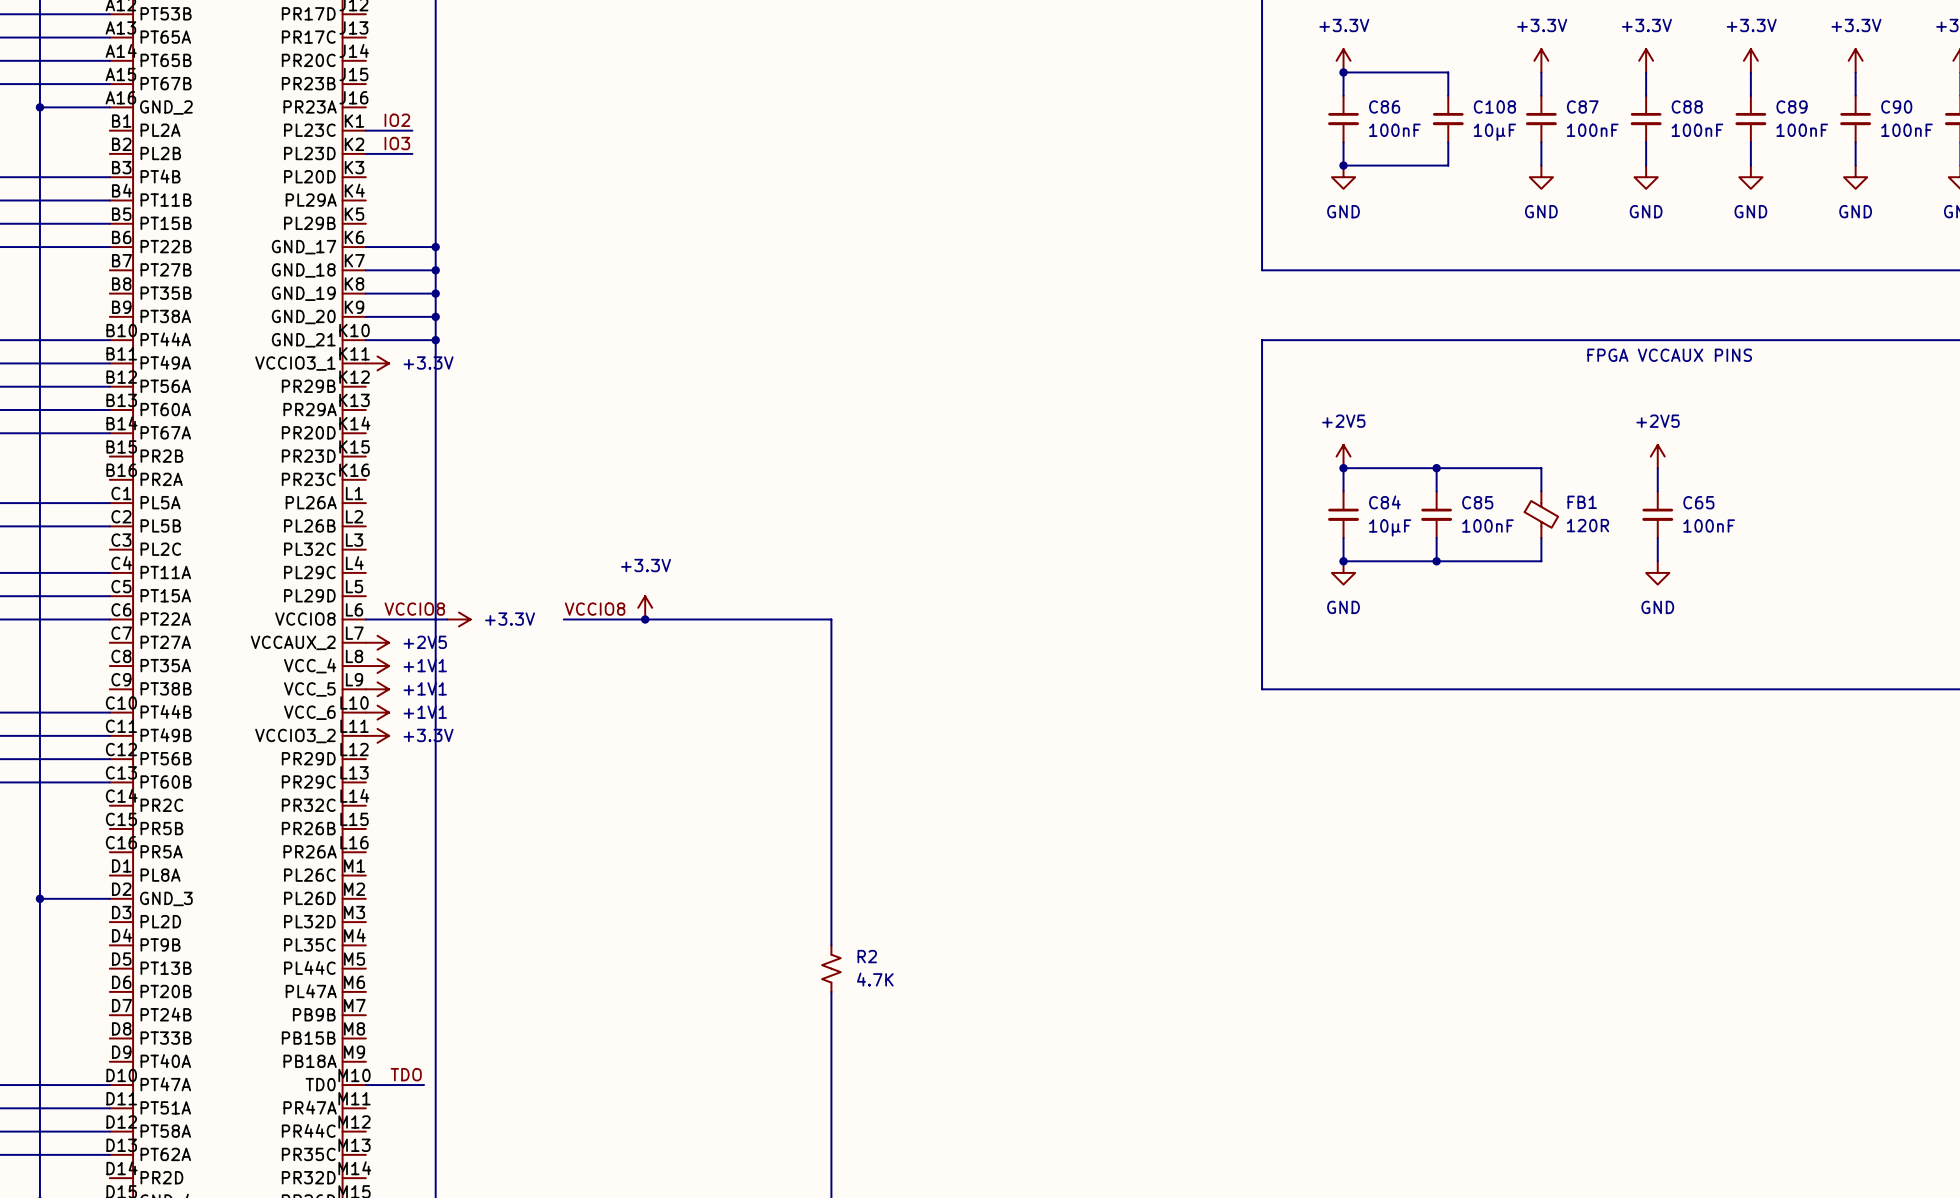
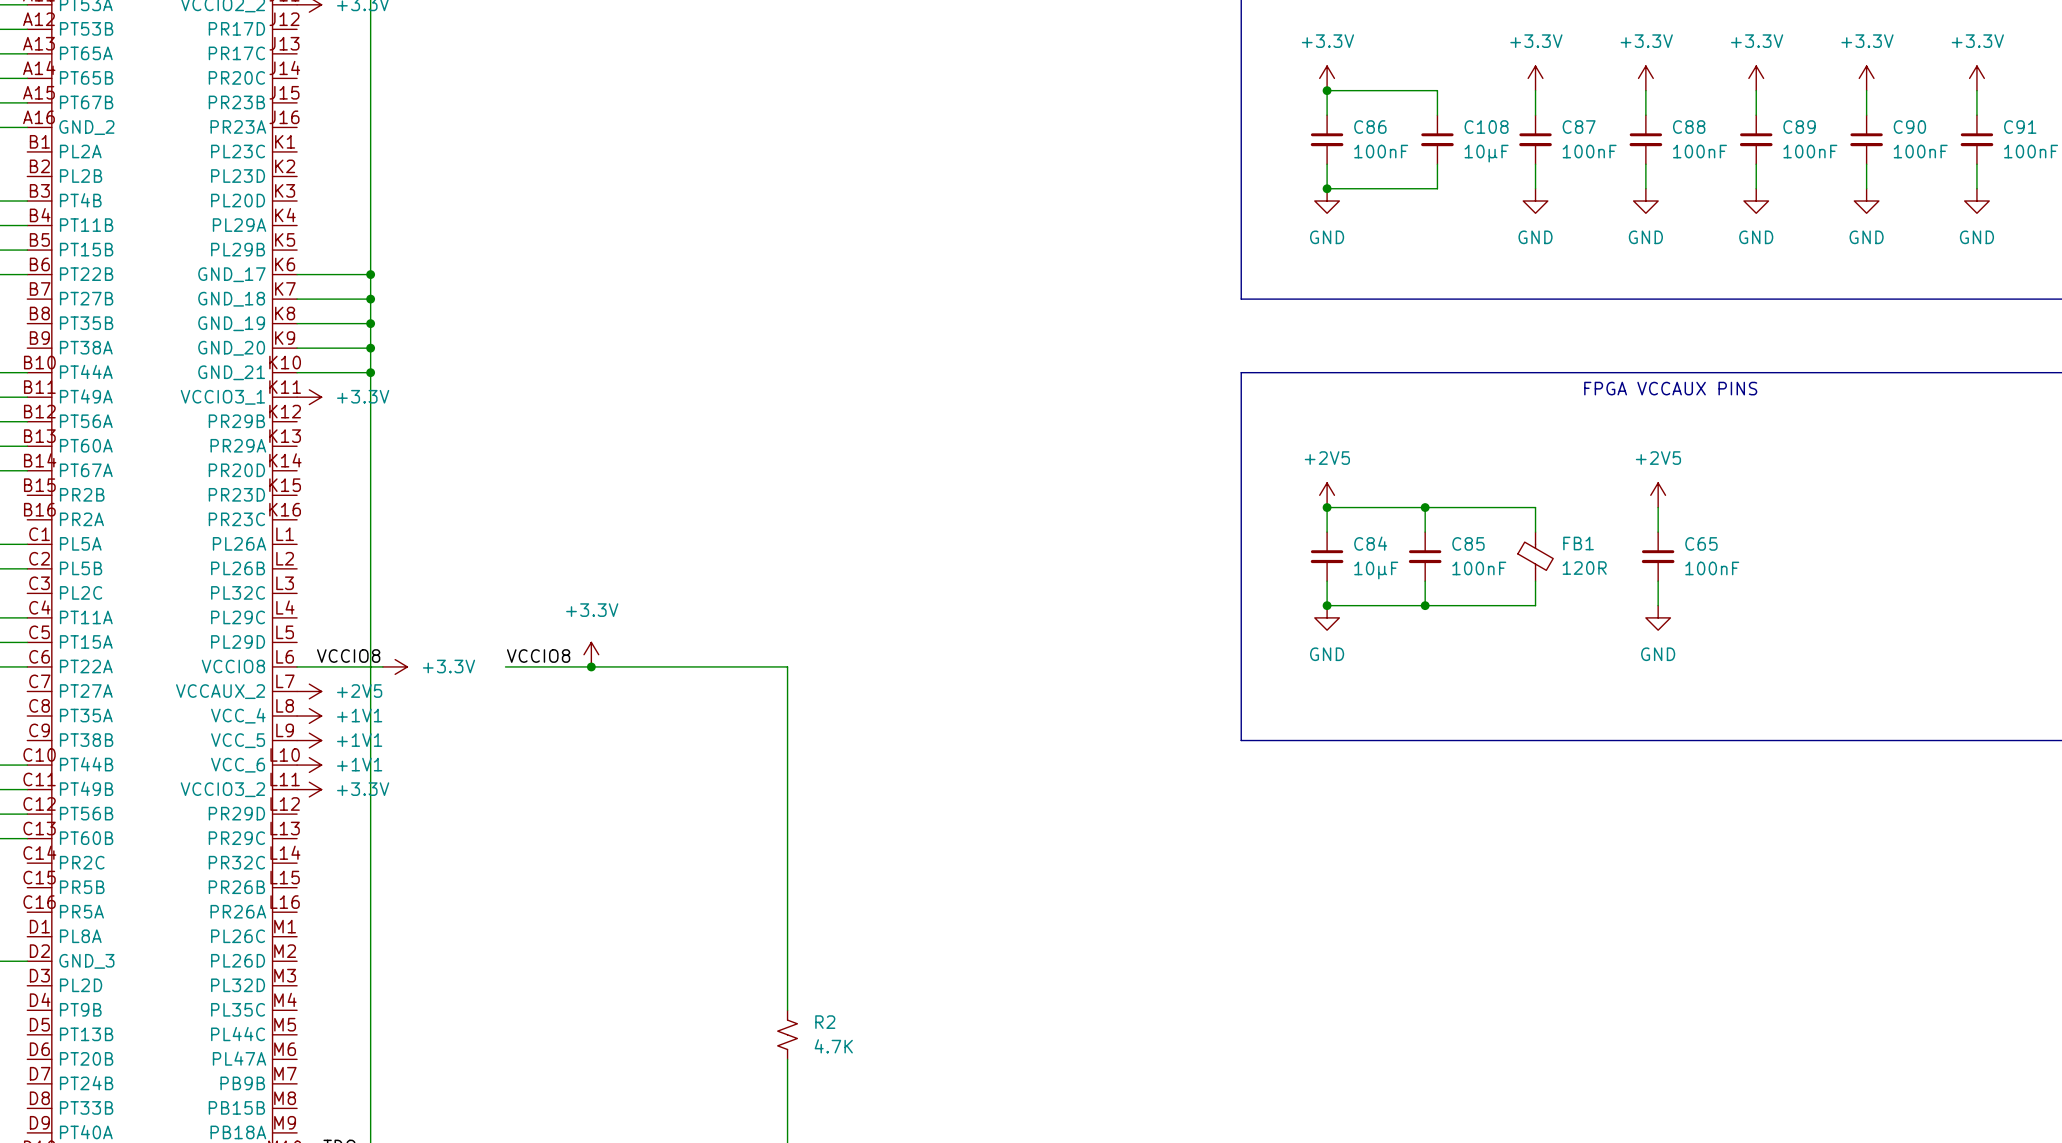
label: IO2 (397, 120) -> none
wire: (365, 130) (412, 130) -> none
label: IO3 (397, 143) -> none
wire: (365, 153) (412, 153) -> none

